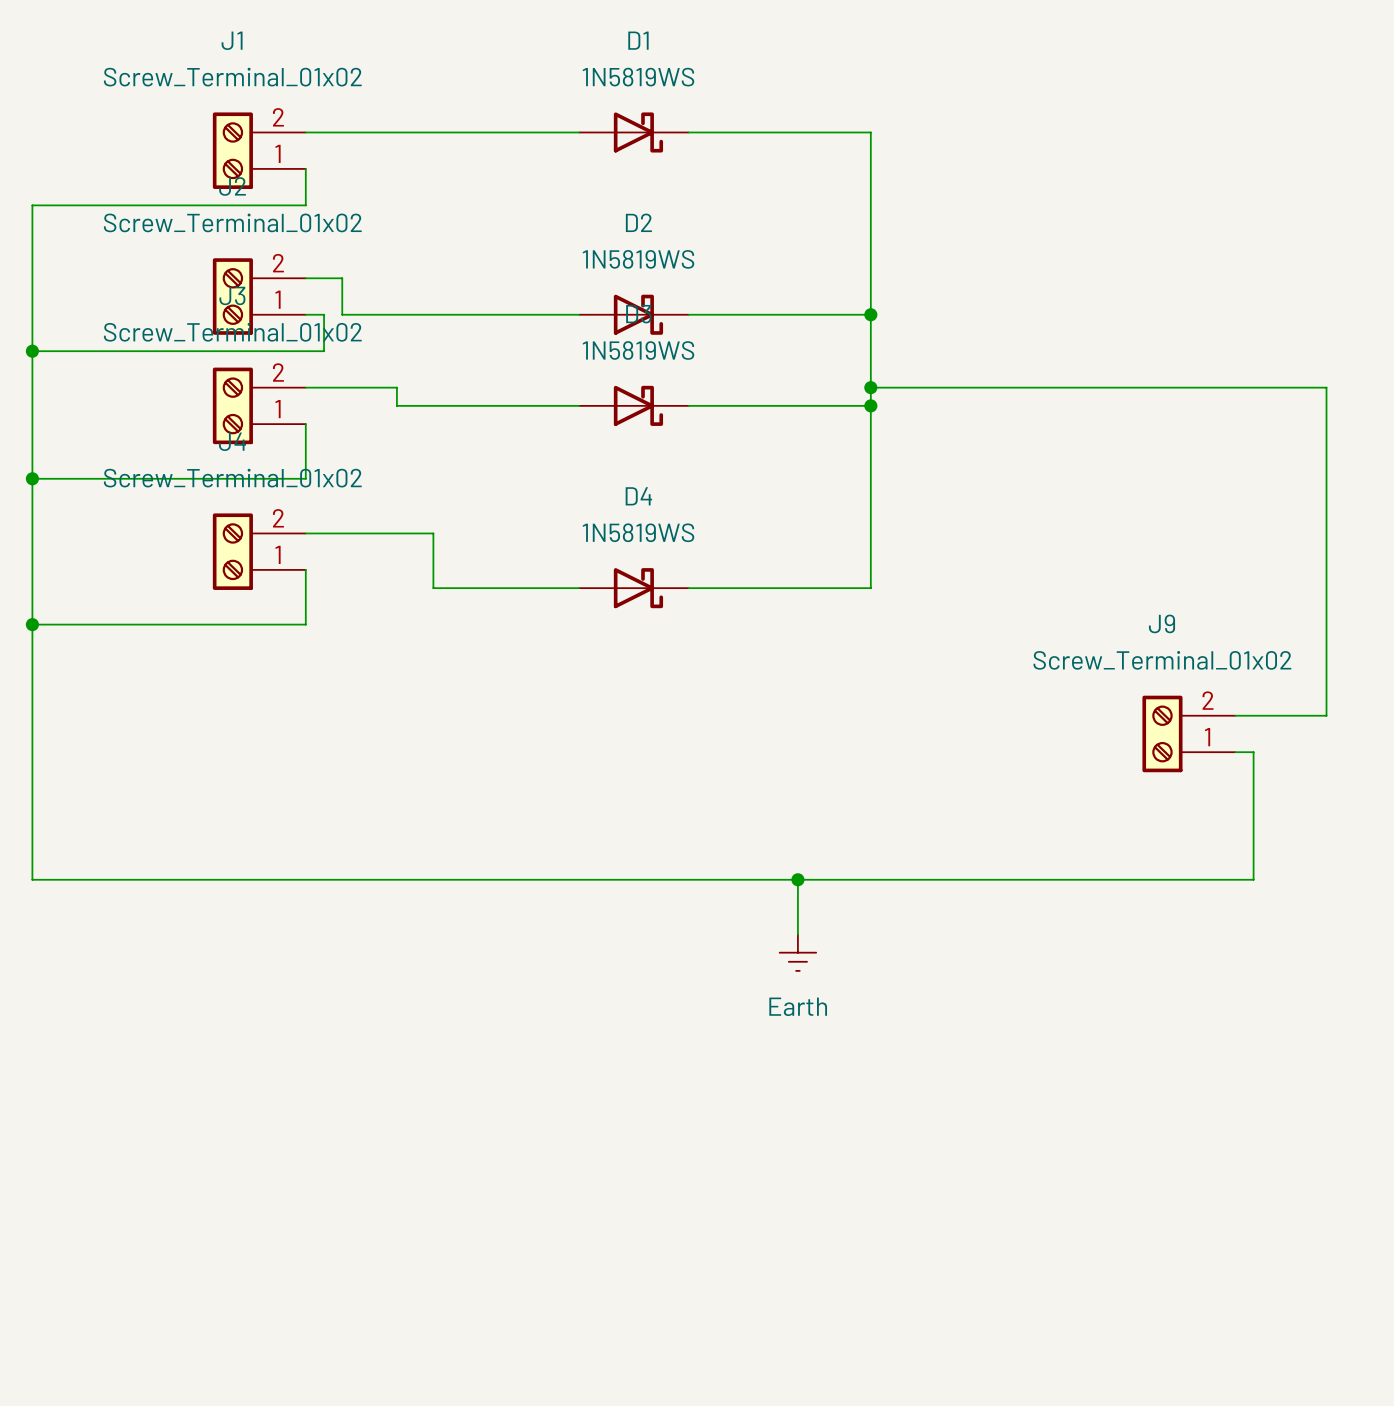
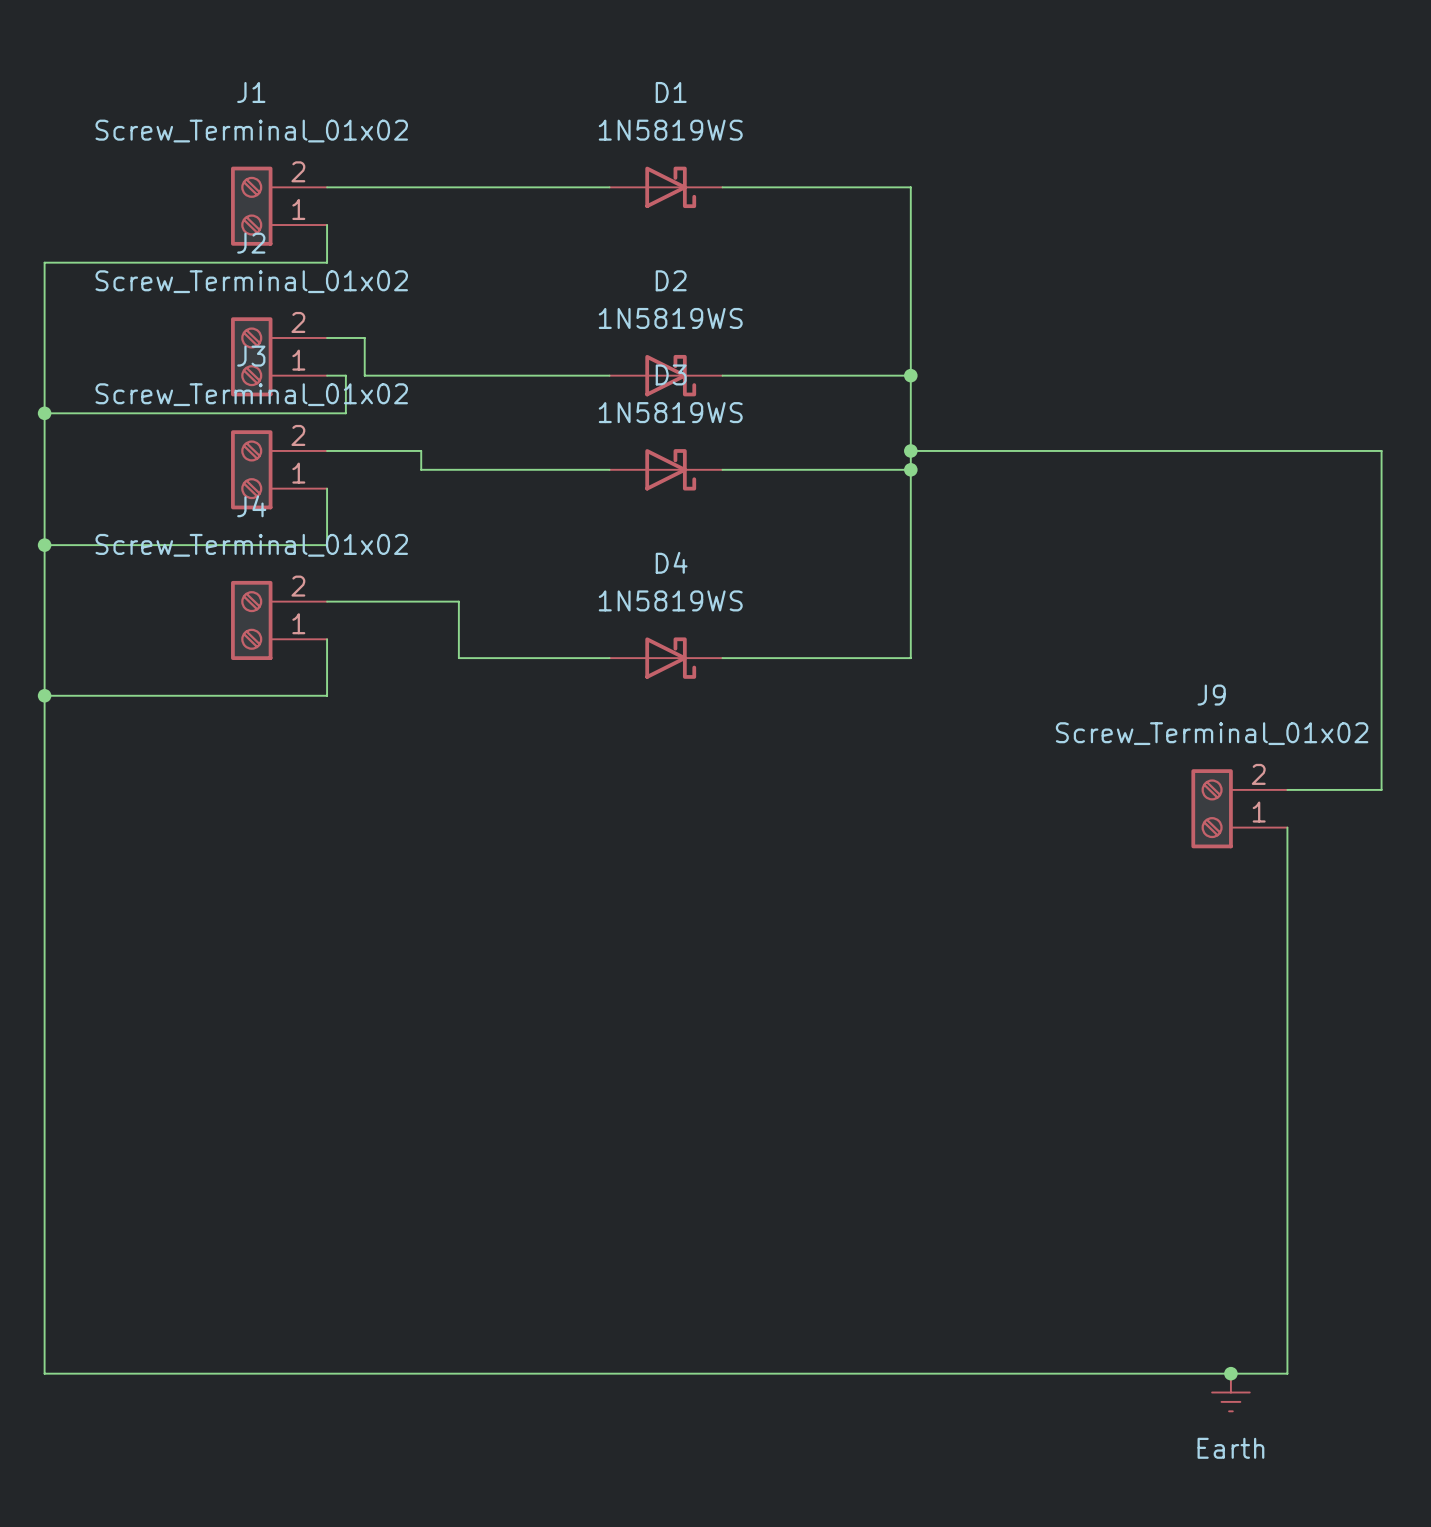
wire: (1235, 752) (1253, 752) (1253, 879) (32, 879) -> (1287, 827) (1287, 1373) (44, 1373) (44, 959)
wire: (797, 879) (797, 934) -> none
junction: (797, 879) -> none
power symbol: Earth (797, 952) -> none
junction: none -> (1230, 1373)
power symbol: none -> Earth (1230, 1392)

